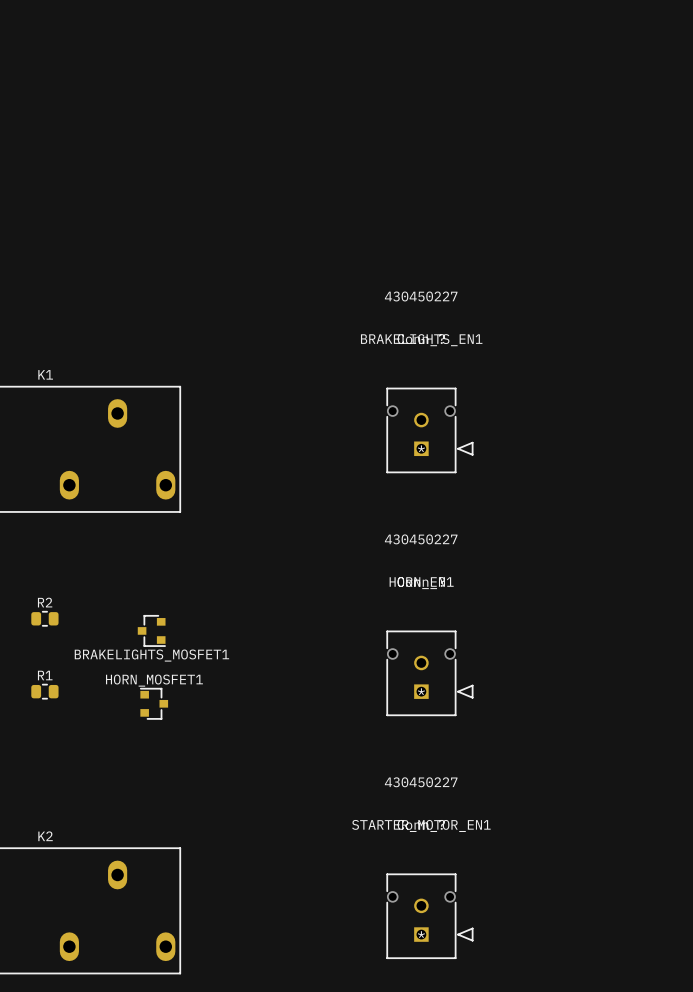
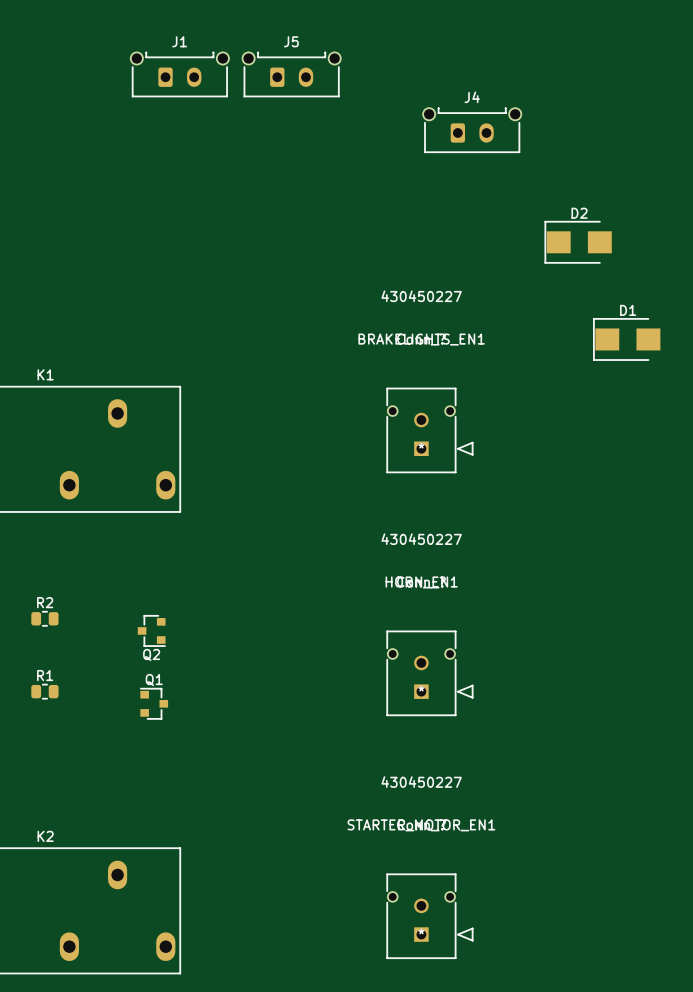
J1: none -> (179, 74)
J5: none -> (291, 74)
J4: none -> (472, 130)
D2: none -> (578, 242)
D1: none -> (626, 339)
BRAKELIGHTS_MOSFET1 name: BRAKELIGHTS_MOSFET1 (151, 655) -> Q2 (151, 654)
HORN_MOSFET1 name: HORN_MOSFET1 (154, 680) -> Q1 (154, 679)

